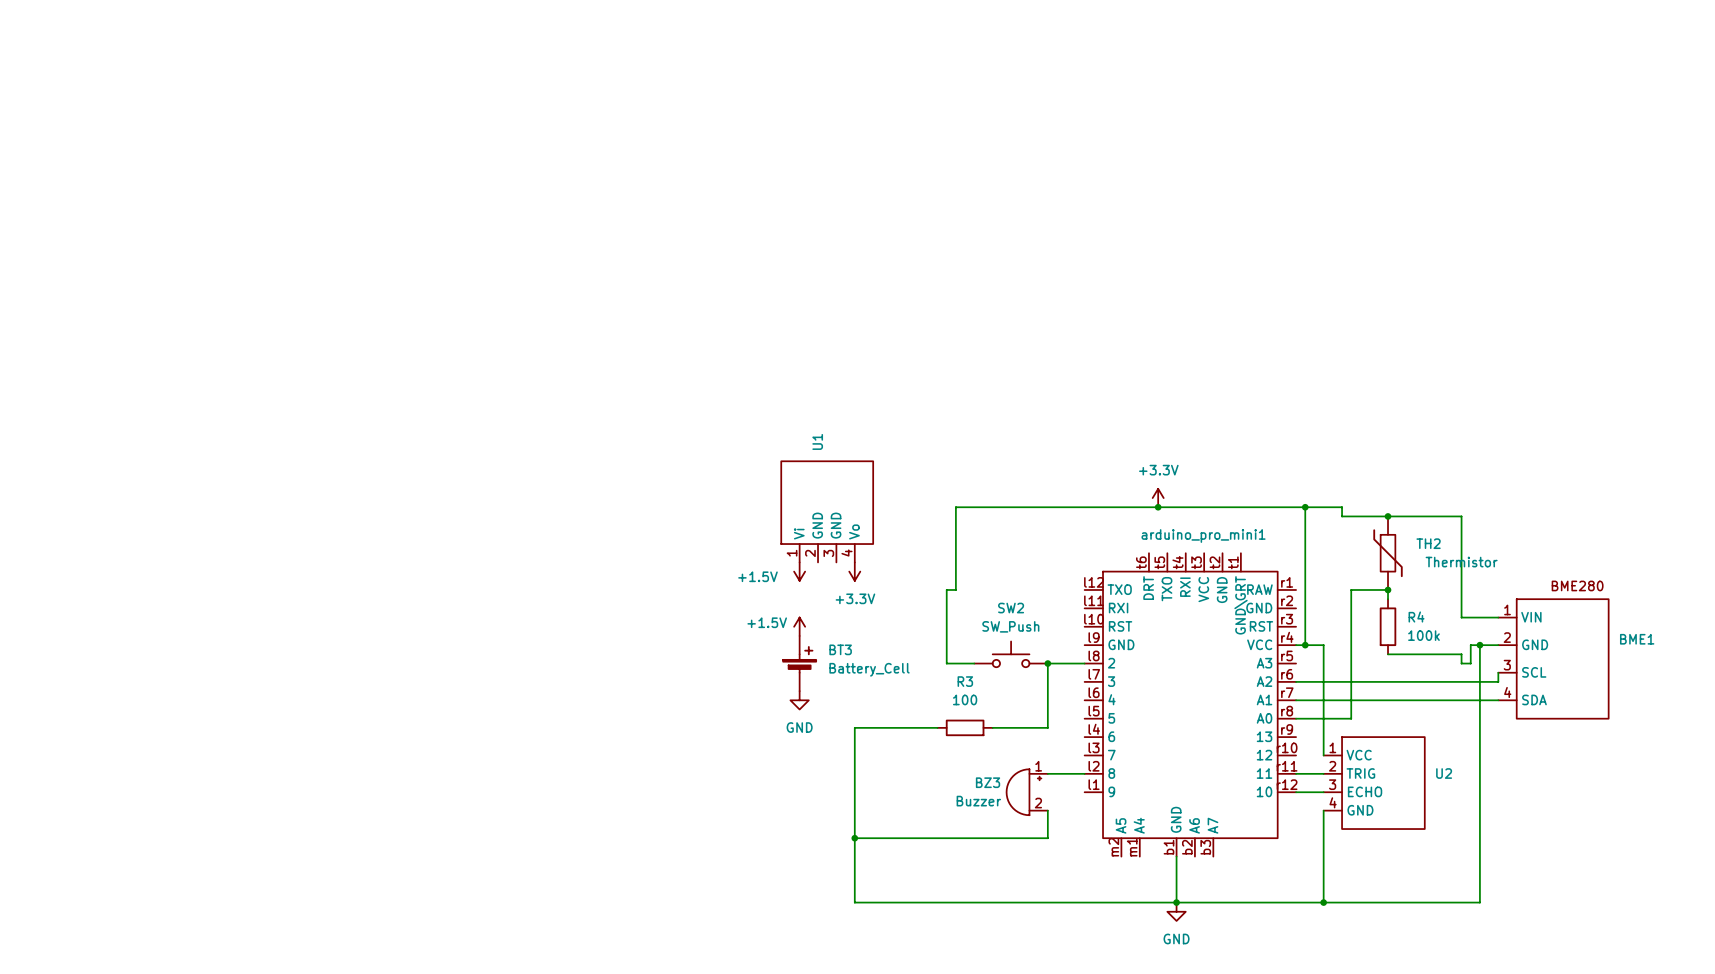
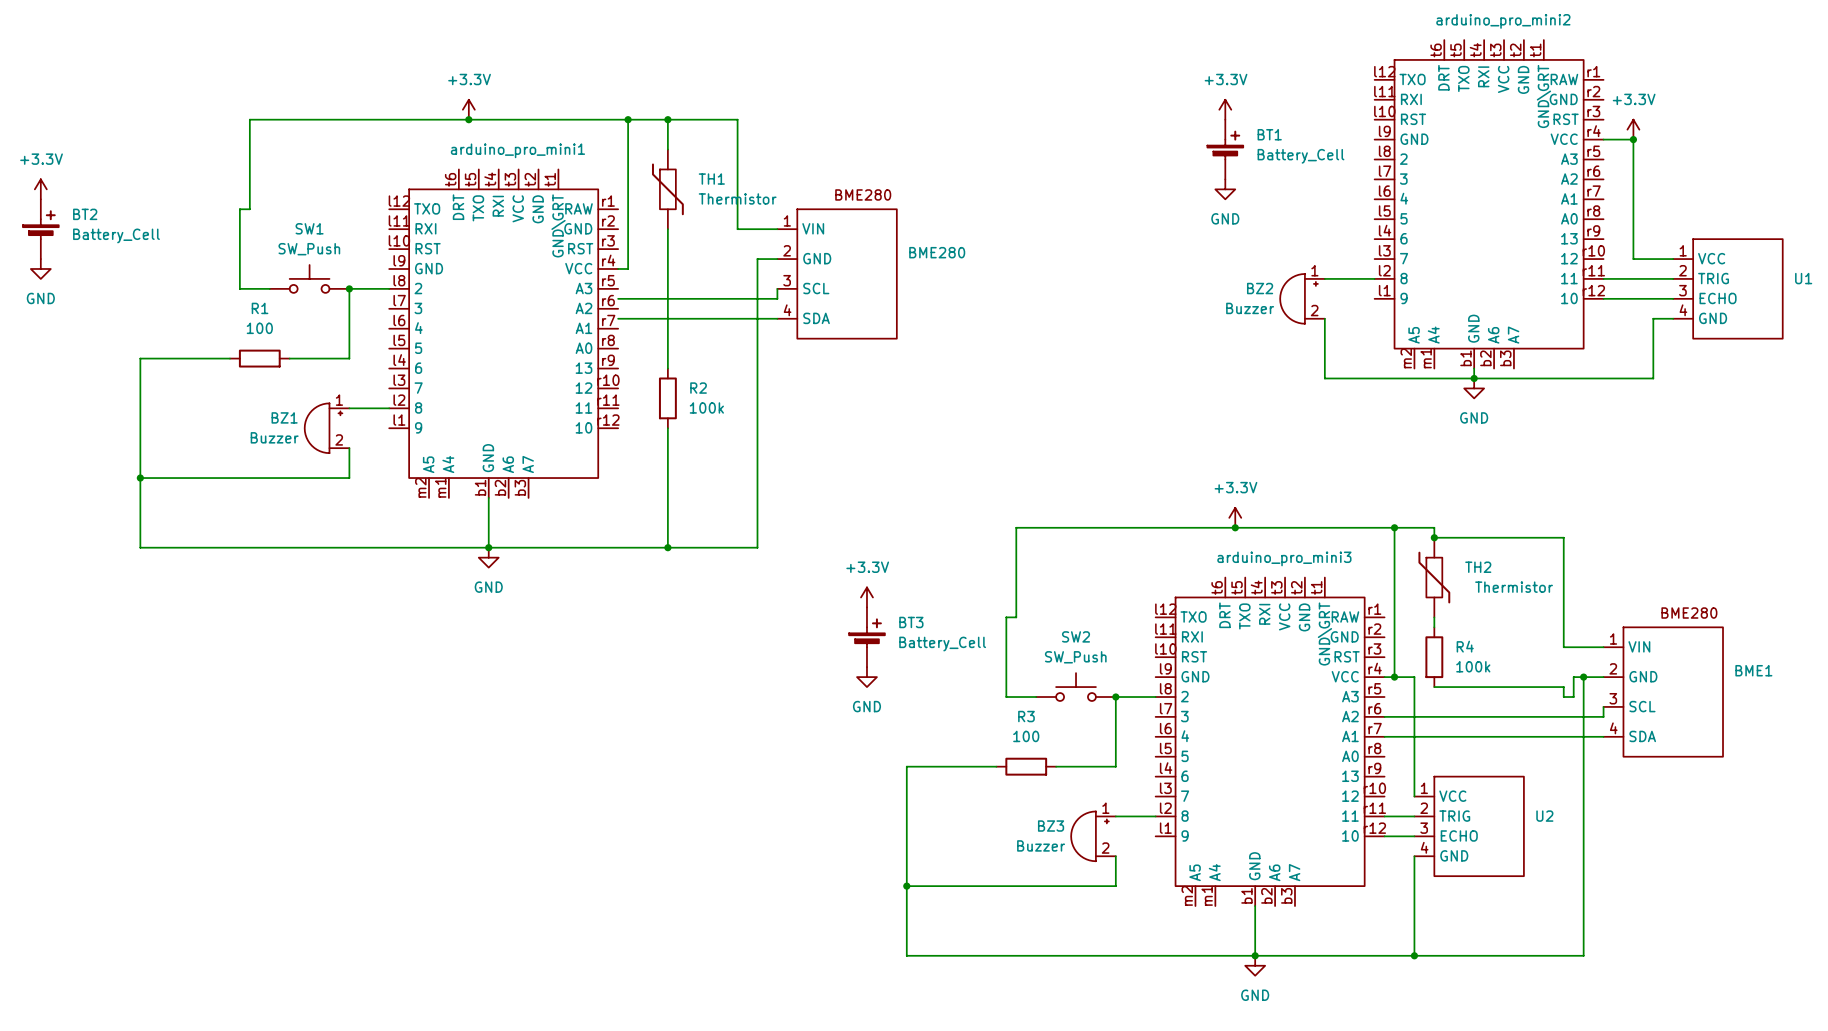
power symbol: none -> +3.3V (468, 109)
power symbol: none -> +3.3V (1225, 109)
junction: none -> (468, 119)
wire: none -> (628, 119) (628, 268) (618, 268)
junction: none -> (628, 119)
wire: none -> (667, 119) (667, 149)
junction: none -> (667, 119)
power symbol: none -> +3.3V (1633, 129)
wire: none -> (1603, 139) (1633, 139) (1633, 259) (1673, 259)
junction: none -> (1633, 139)
BT1: none -> Battery_Cell (1225, 149)
power symbol: none -> +3.3V (40, 189)
TH1: none -> Thermistor (667, 189)
power symbol: none -> GND (1225, 189)
arduino_pro_mini2: none -> (1489, 204)
BT2: none -> Battery_Cell (40, 229)
wire: none -> (667, 229) (667, 368)
wire: none -> (777, 229) (737, 229) (737, 119) (249, 119) (249, 209) (239, 209) (239, 288) (269, 288)
wire: none -> (777, 259) (757, 259) (757, 547) (140, 547) (140, 358) (229, 358)
power symbol: none -> GND (40, 268)
BME280: none -> (837, 273)
SW1: none -> SW_Push (309, 278)
wire: none -> (1324, 278) (1374, 278)
wire: none -> (1603, 278) (1673, 278)
junction: none -> (349, 288)
wire: none -> (389, 288) (349, 288) (349, 358) (289, 358)
wire: none -> (777, 288) (777, 298) (618, 298)
BZ2: none -> Buzzer (1302, 298)
wire: none -> (1603, 298) (1673, 298)
wire: none -> (618, 318) (777, 318)
wire: none -> (1324, 318) (1324, 378) (1653, 378) (1653, 318) (1673, 318)
arduino_pro_mini1: none -> (503, 333)
R1: none -> 100 (259, 358)
wire: none -> (1474, 368) (1474, 378)
junction: none -> (1474, 378)
power symbol: none -> GND (1474, 388)
R2: none -> 100k (667, 398)
wire: none -> (349, 408) (389, 408)
BZ1: none -> Buzzer (327, 428)
wire: none -> (667, 428) (667, 547)
wire: none -> (349, 448) (349, 478) (140, 478)
U1 name position: U1 (817, 441) -> U1 (1803, 278)
junction: none -> (140, 478)
U1 symbol: [781, 461, 874, 563] -> [1673, 239, 1783, 339]
wire: none -> (488, 497) (488, 547)
junction: none -> (1434, 537)
junction: (1388, 516) -> none
junction: none -> (488, 547)
junction: none -> (667, 547)
power symbol: none -> GND (488, 557)
arduino_pro_mini1 name: arduino_pro_mini1 (1203, 536) -> arduino_pro_mini3 (1284, 558)
TH2 position: (1388, 553) -> (1434, 577)
power symbol: +1.5V (799, 571) -> none
power symbol rotation: 0° (854, 571) -> 180° (866, 597)
power symbol position: +3.3V (854, 571) -> +3.3V (866, 597)
wire: none -> (1434, 617) (1434, 627)
junction: (1388, 589) -> none
wire: (1388, 599) (1388, 589) (1351, 589) (1351, 718) (1296, 718) -> none
power symbol: +1.5V (799, 626) -> none
R4 position: (1388, 626) -> (1434, 657)
wire: none -> (1434, 687) (1484, 687)
BT3 position: (799, 663) -> (866, 637)
power symbol position: GND (799, 700) -> GND (866, 677)

